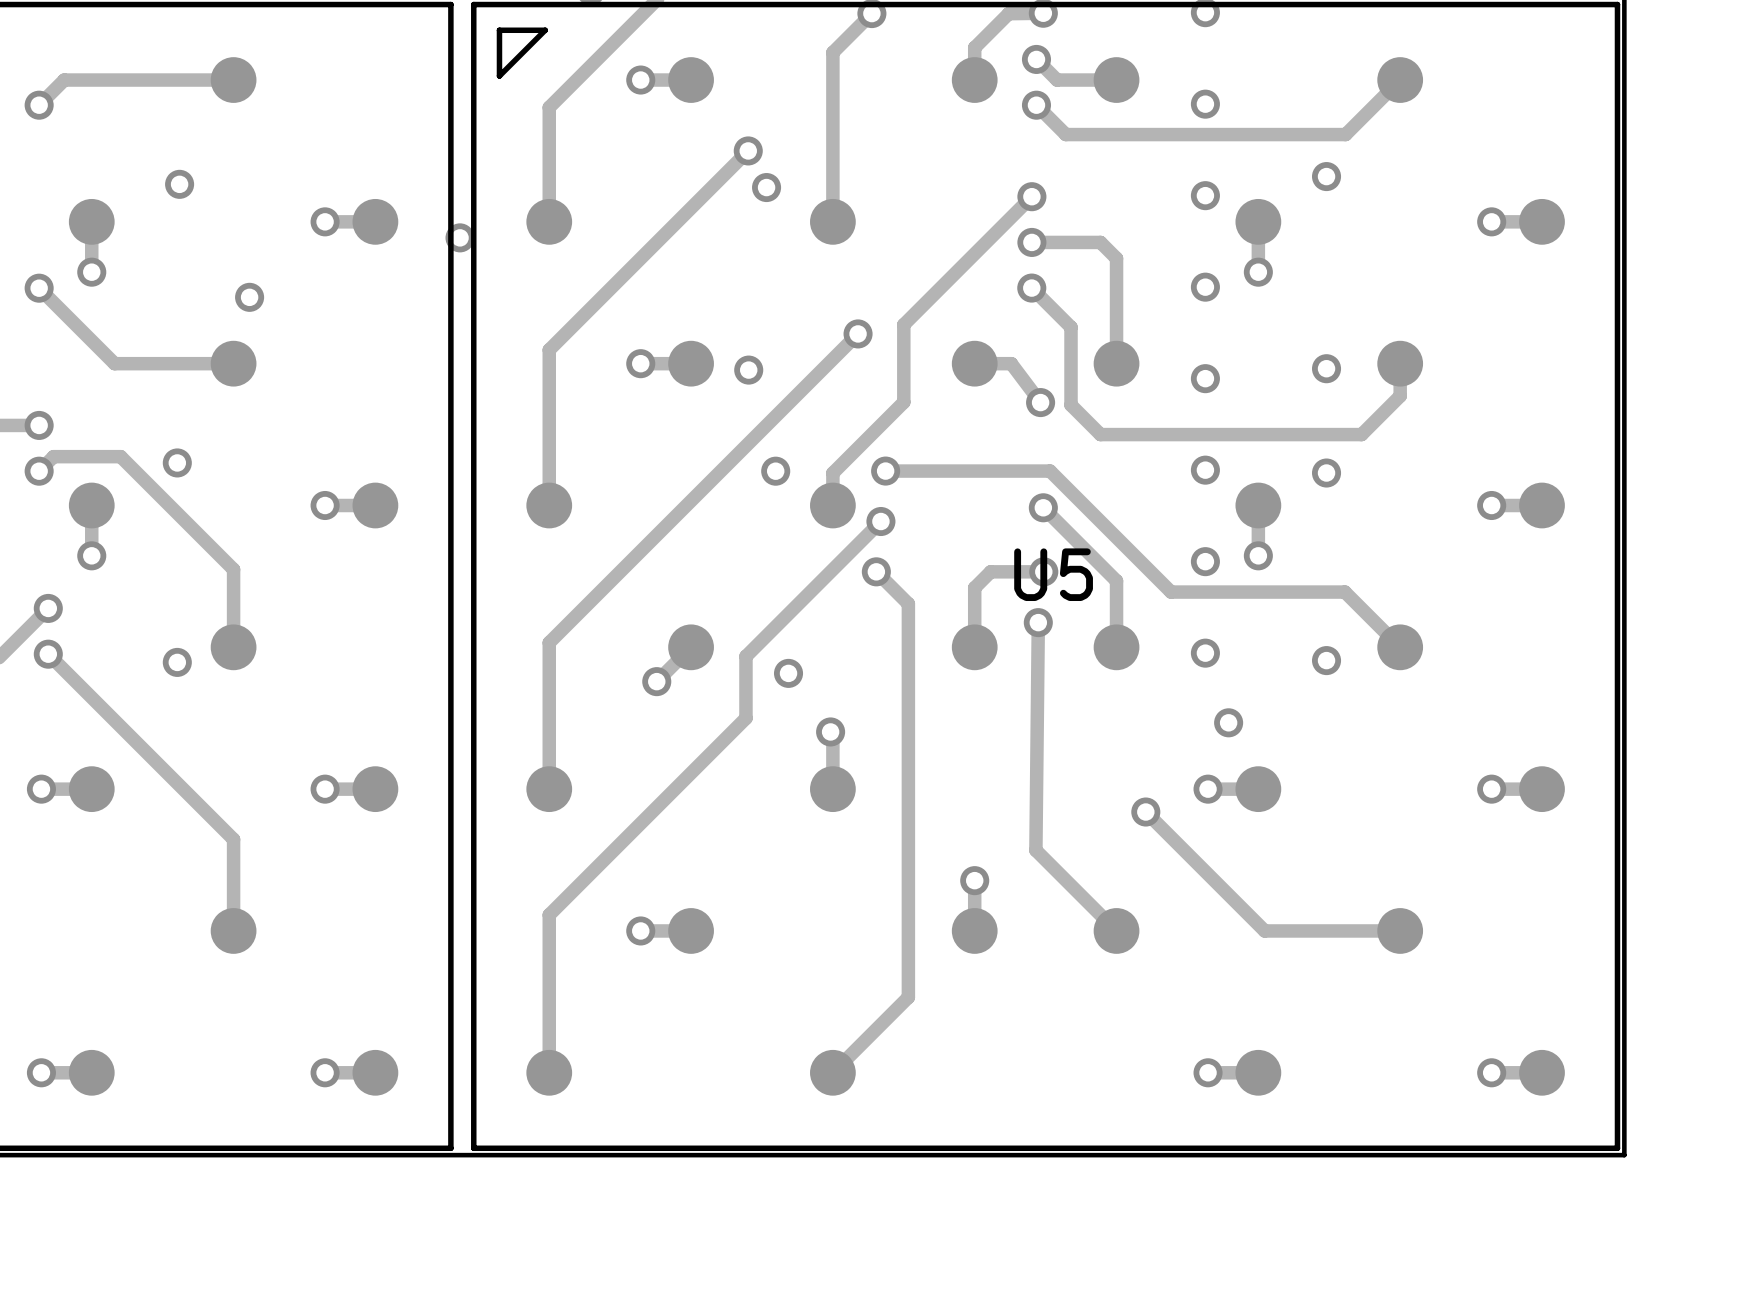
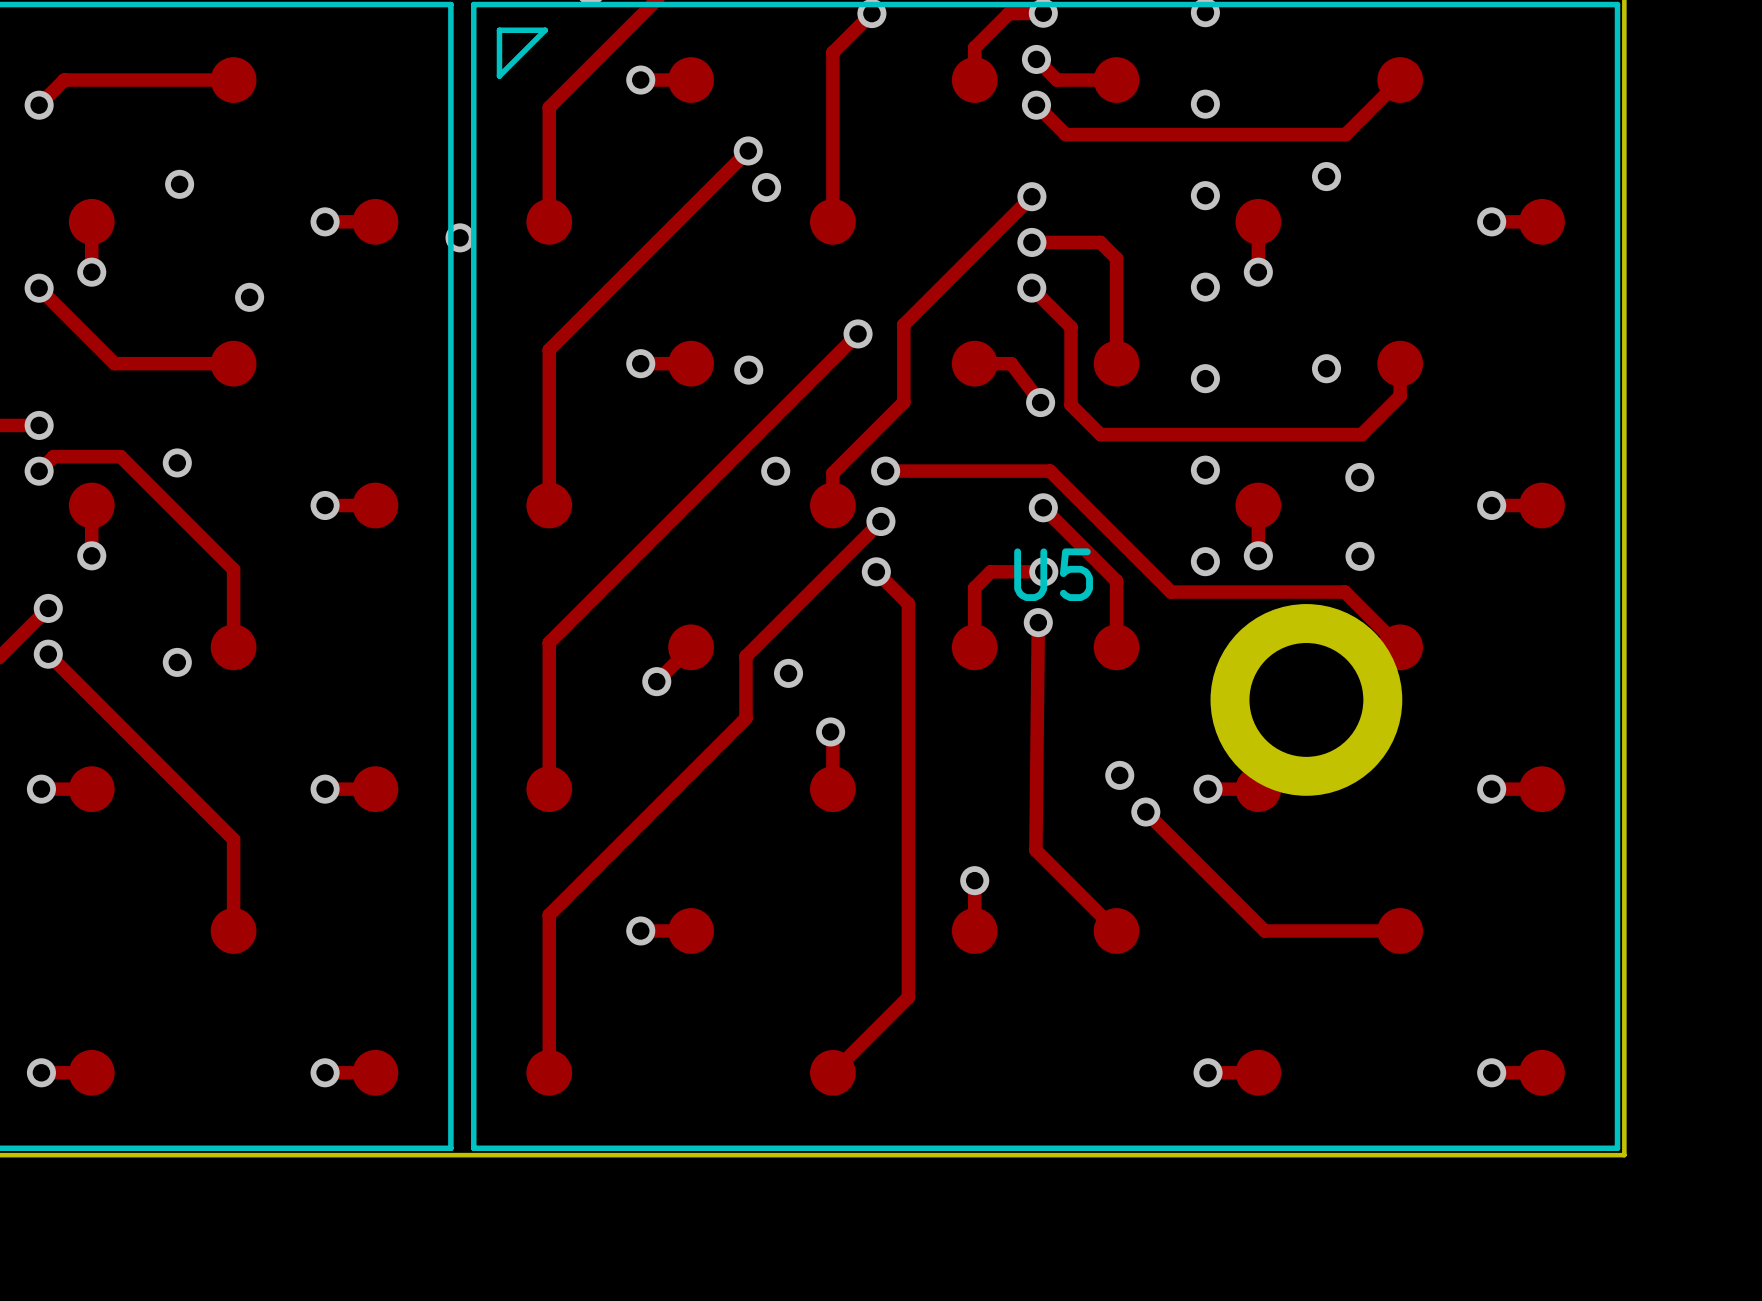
via position: (1326, 473) -> (1359, 477)
via: none -> (1360, 556)
via: (1205, 653) -> none
via: (1326, 660) -> none
part: none -> (1306, 699)
via: (1228, 722) -> none
via: none -> (1119, 775)

